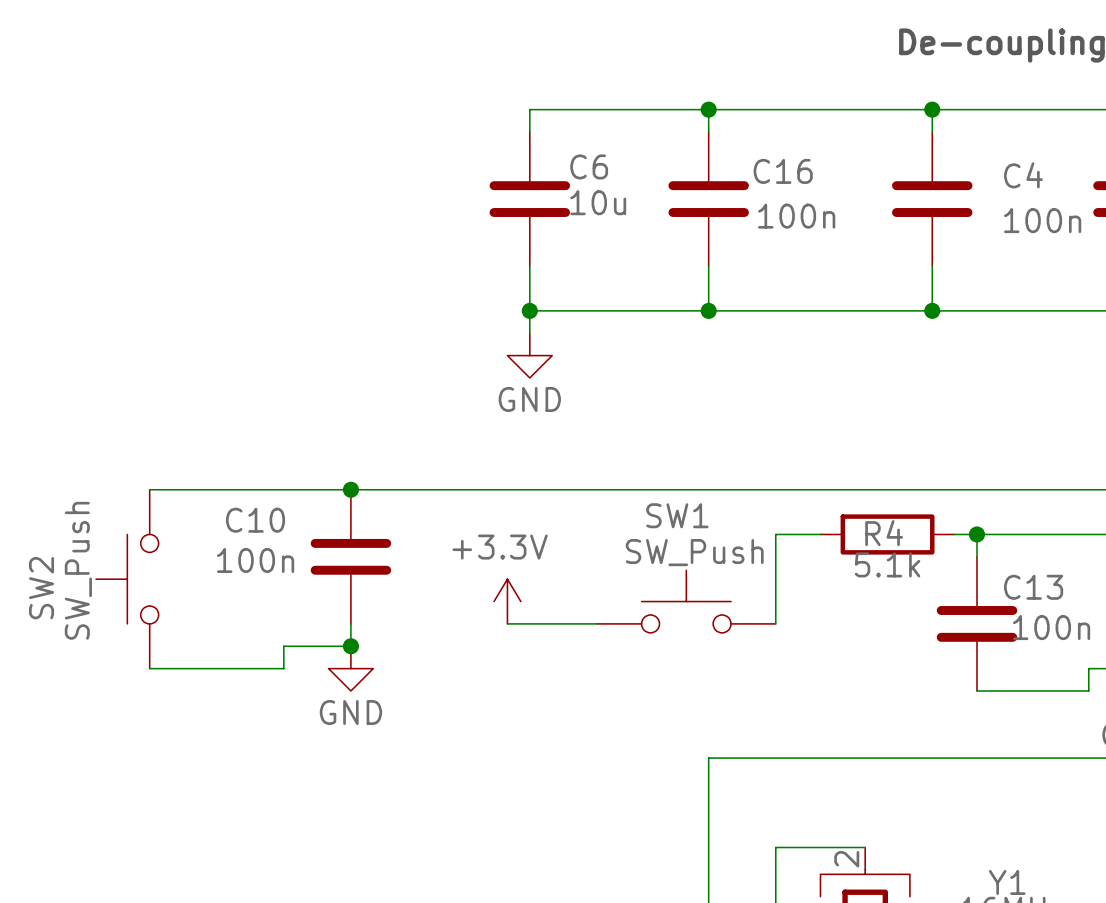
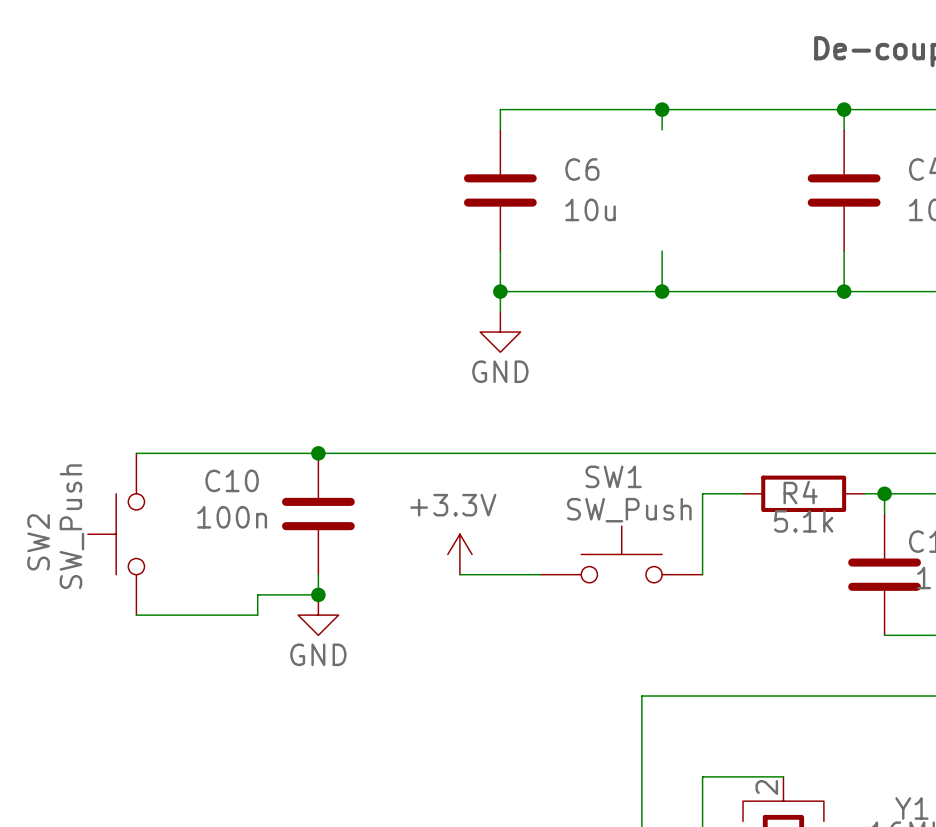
wire: (552, 109) (529, 109) (529, 132) -> (500, 109) (500, 129)
wire: (708, 109) (708, 132) -> (662, 109) (662, 129)
junction position: (708, 109) -> (662, 109)
C6 name position: C6 (589, 166) -> C6 (582, 169)
C6 position: (529, 199) -> (500, 190)
C16: 100n (708, 199) -> none
C6 value position: 10u (598, 202) -> 10u (590, 209)
wire: (529, 266) (529, 333) -> (500, 251) (500, 311)
wire: (708, 266) (708, 310) -> (662, 251) (662, 291)
wire: (529, 310) (552, 310) -> none
junction position: (529, 310) -> (500, 291)
junction position: (708, 310) -> (662, 291)
power symbol position: GND (529, 355) -> GND (500, 332)

